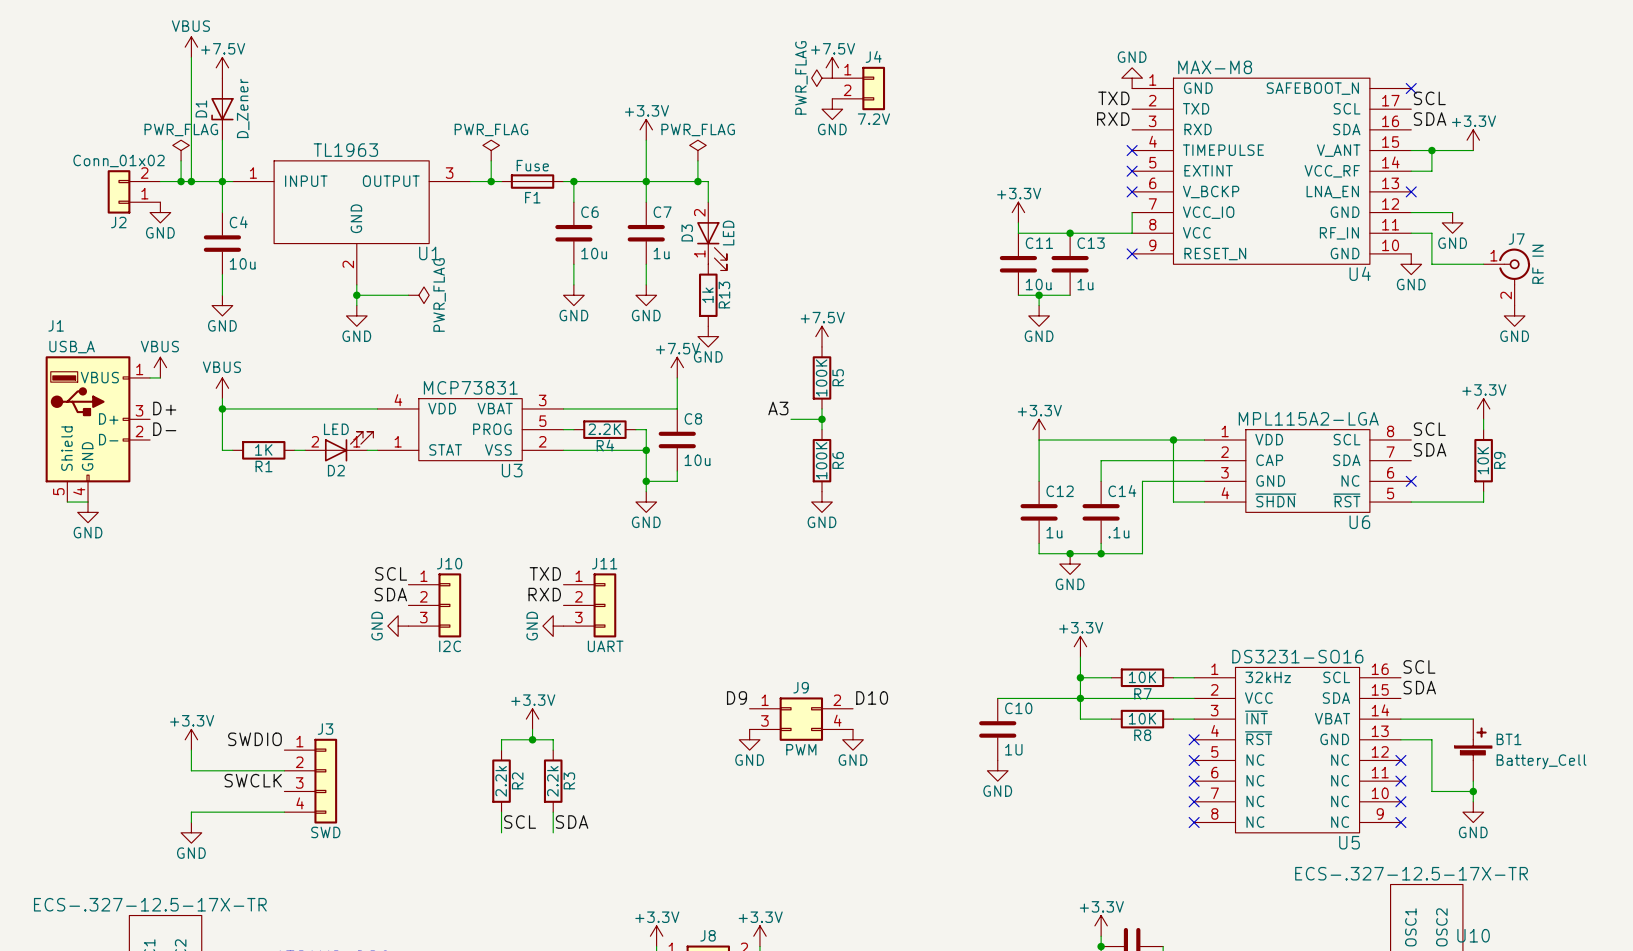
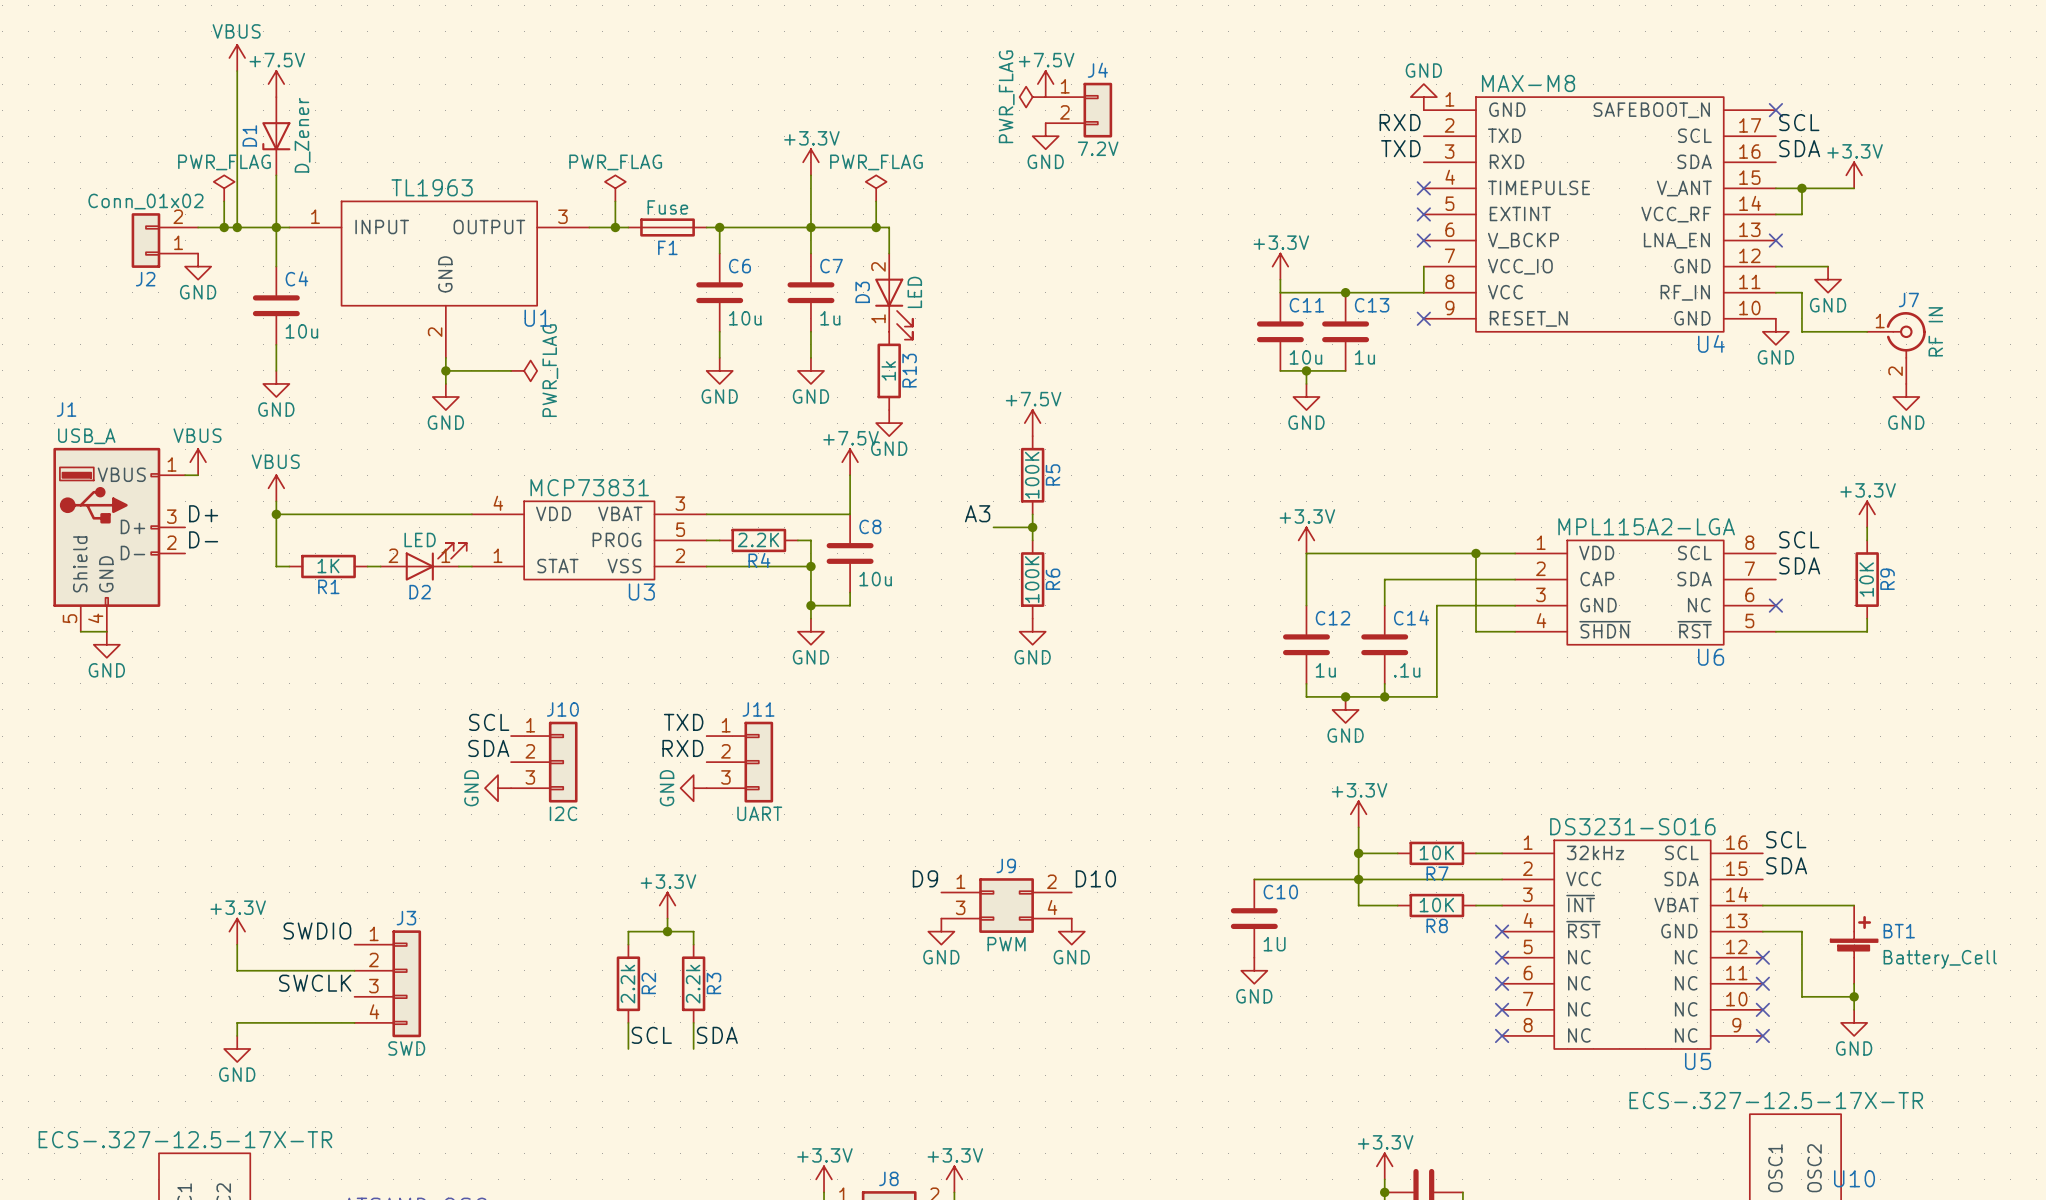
label: TXD (1113, 98) -> RXD (1400, 122)
label: RXD (1113, 119) -> TXD (1400, 148)

